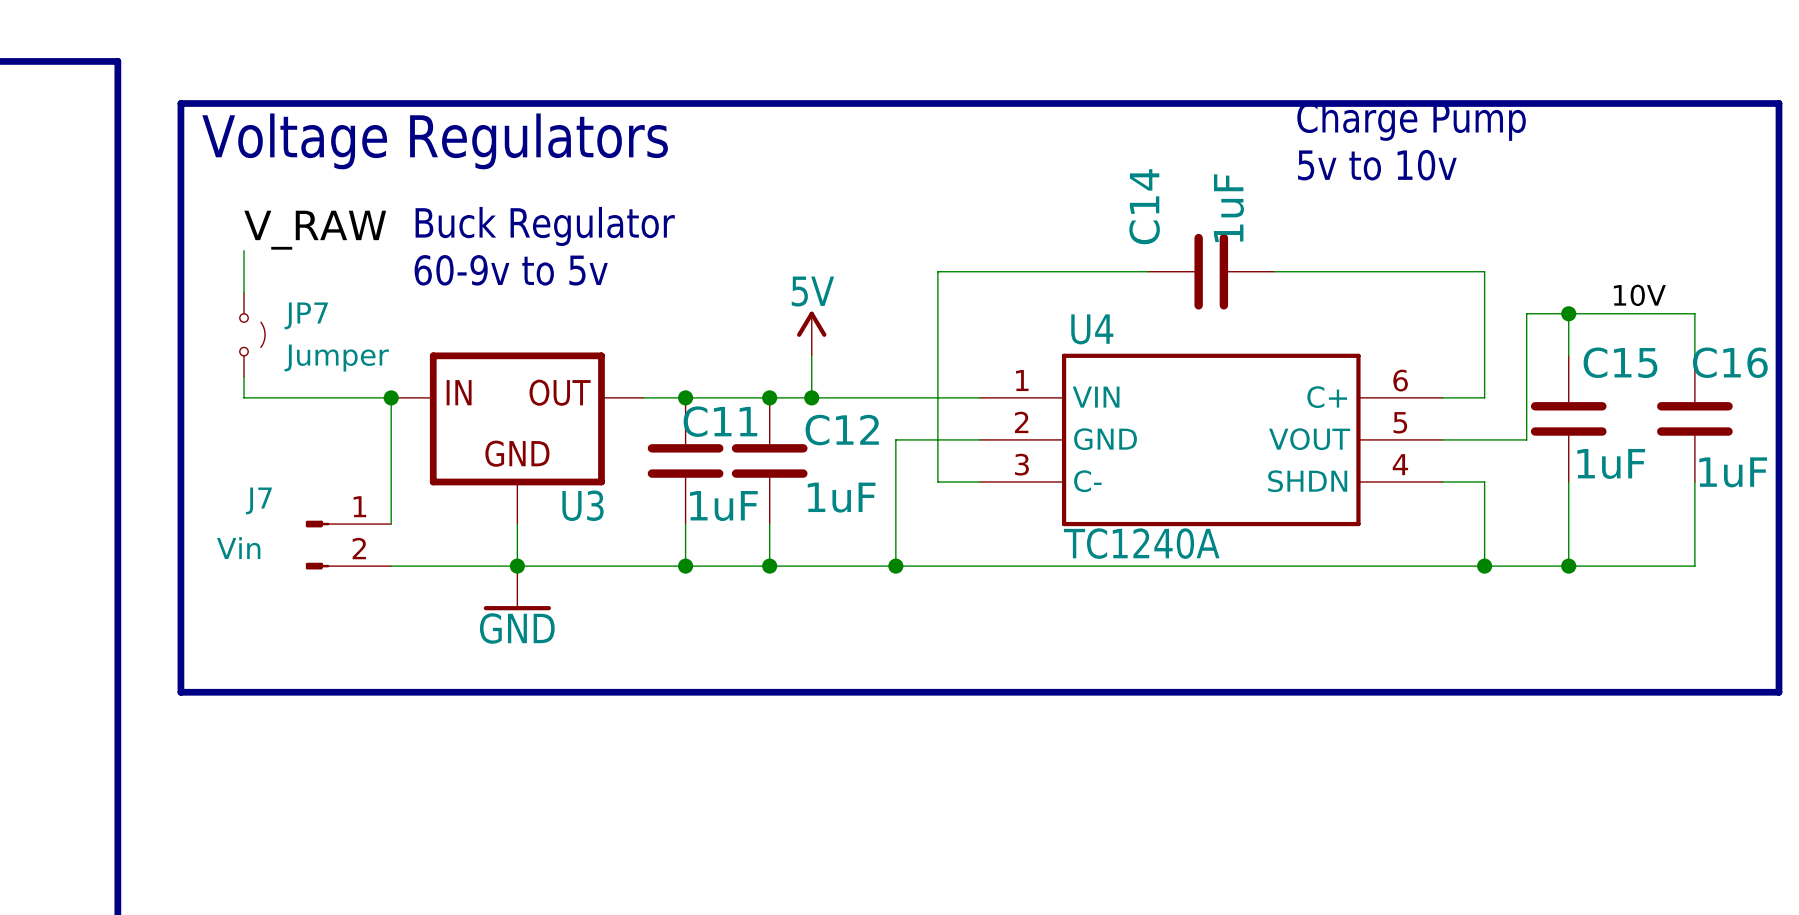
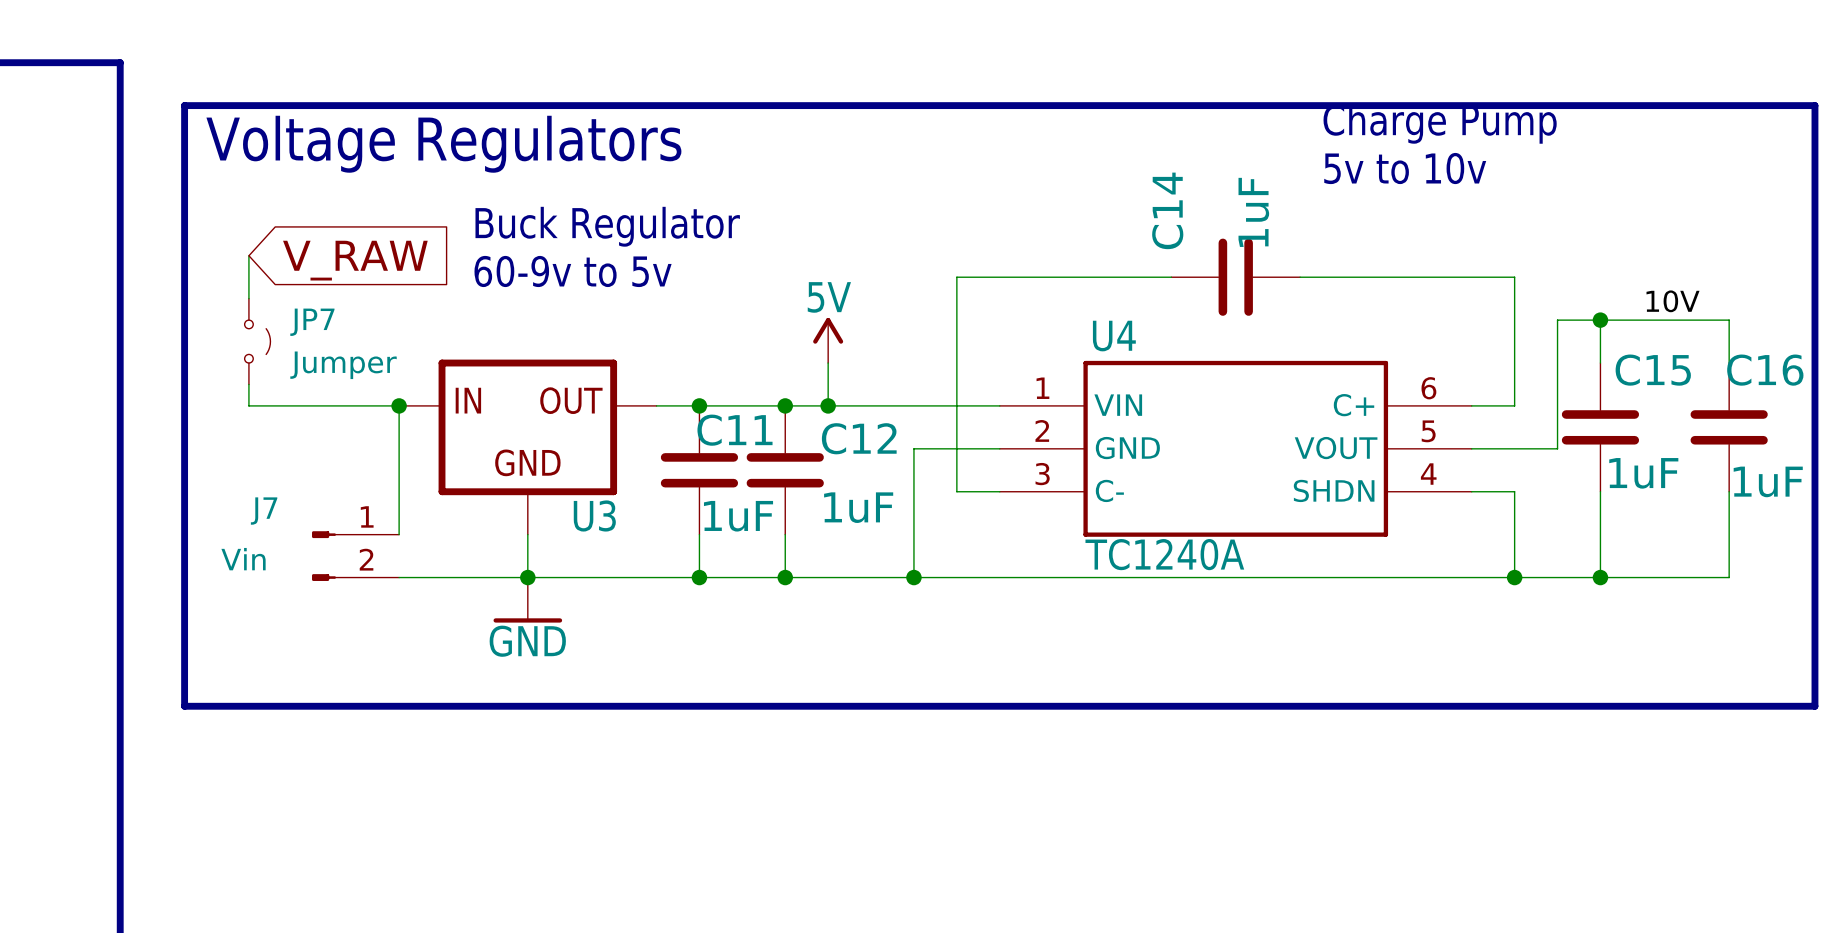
text position: Buck Regulator (545, 226) -> Buck Regulator (607, 226)
label: V_RAW (315, 230) -> none
global label: none -> V_RAW (355, 260)
text position: 60-9v to 5v (511, 270) -> 60-9v to 5v (573, 271)

